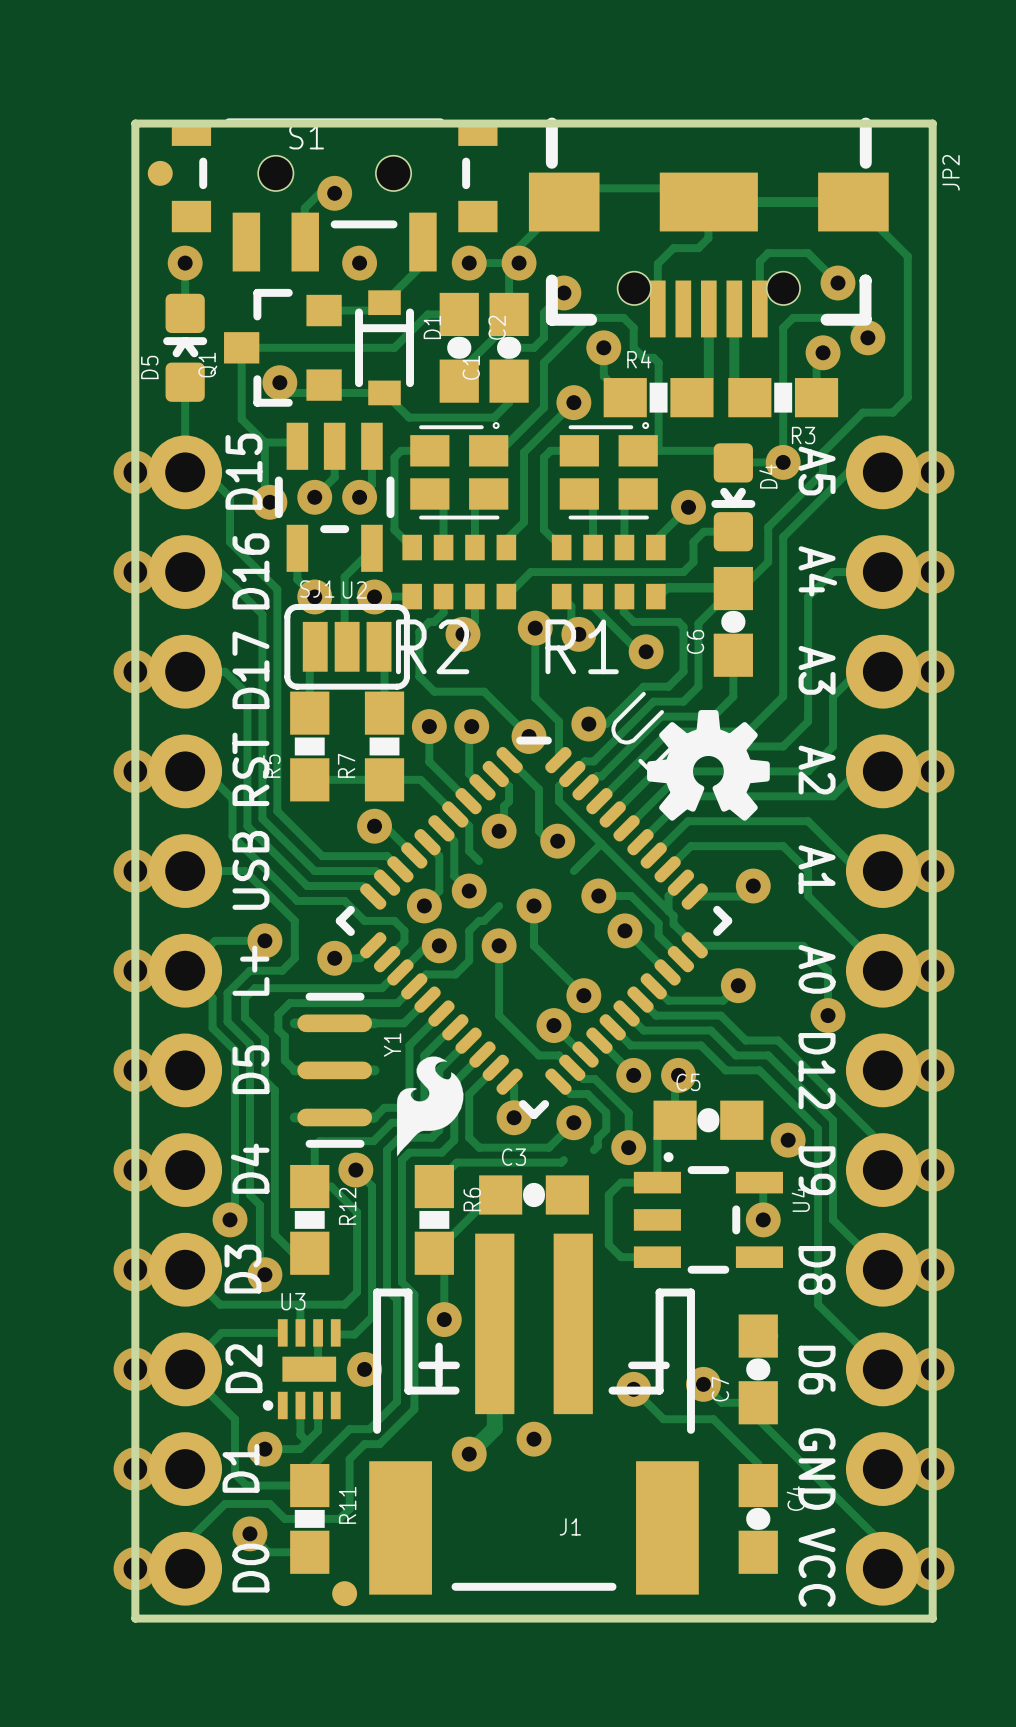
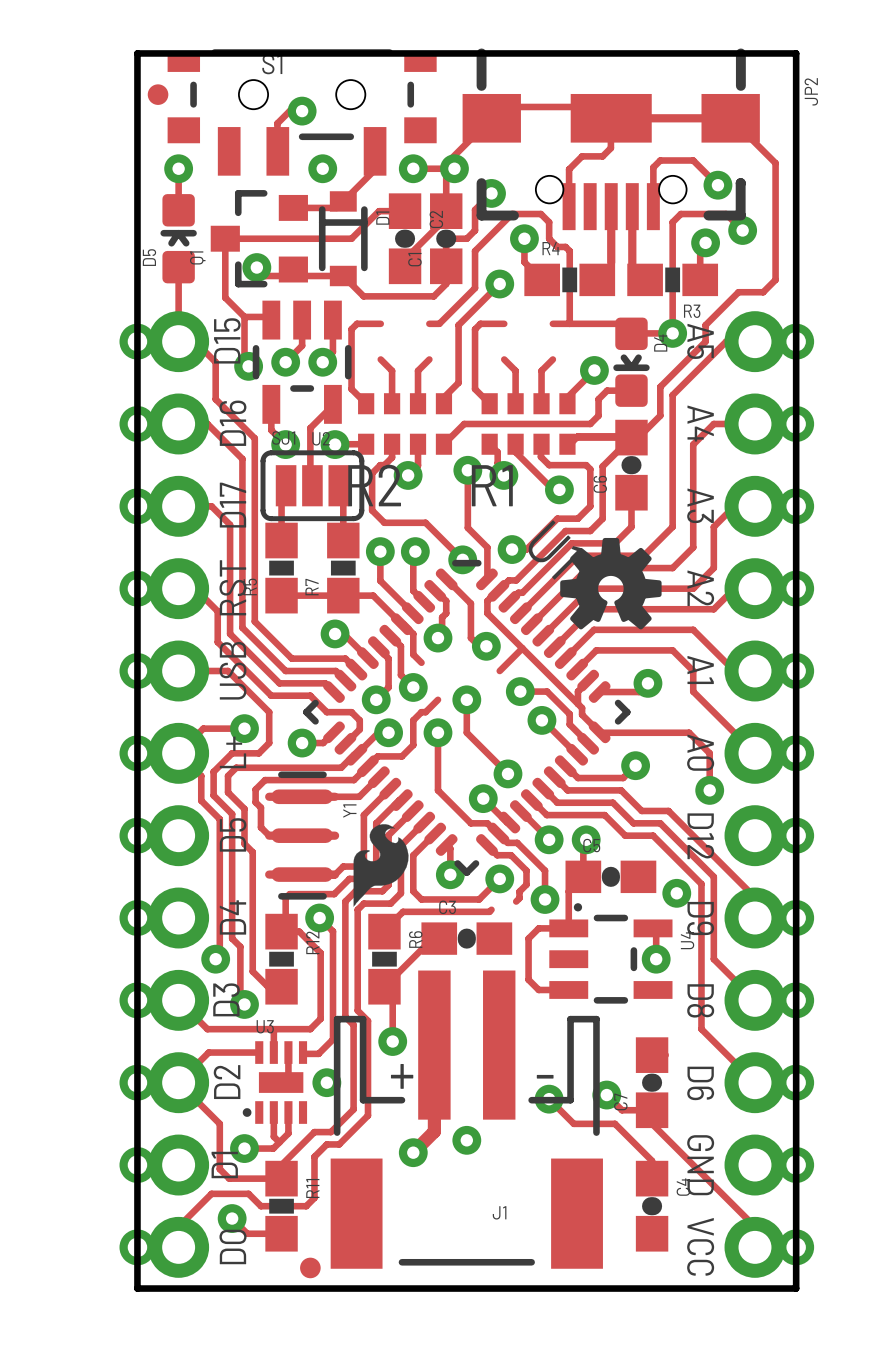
part: (459, 470) -> none
part: (608, 470) -> none

